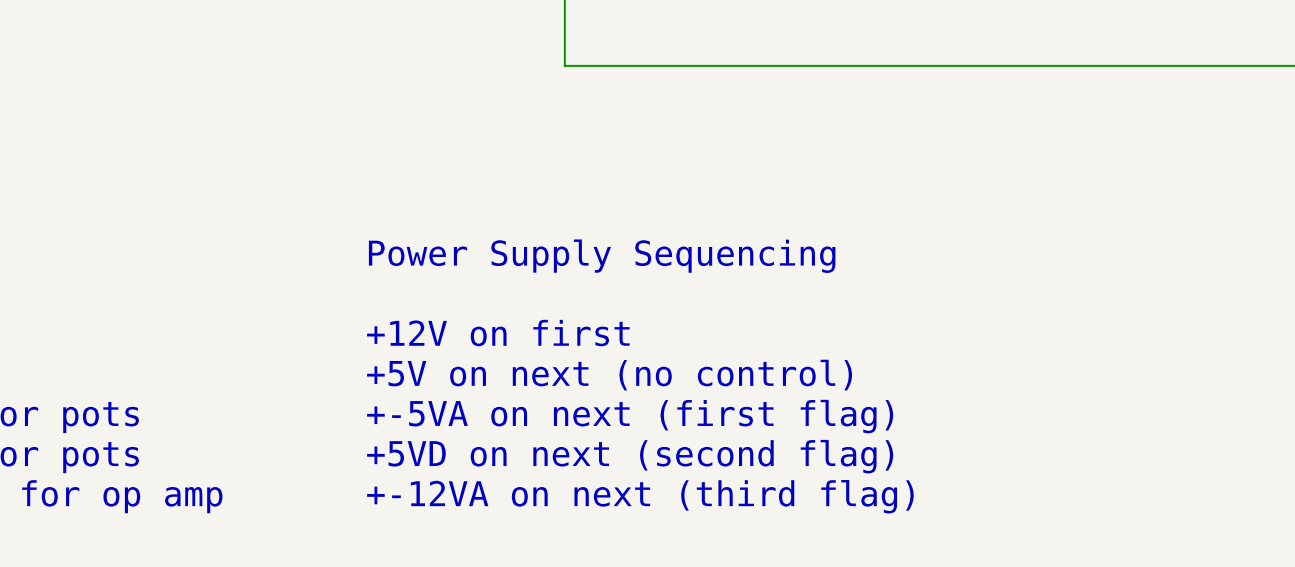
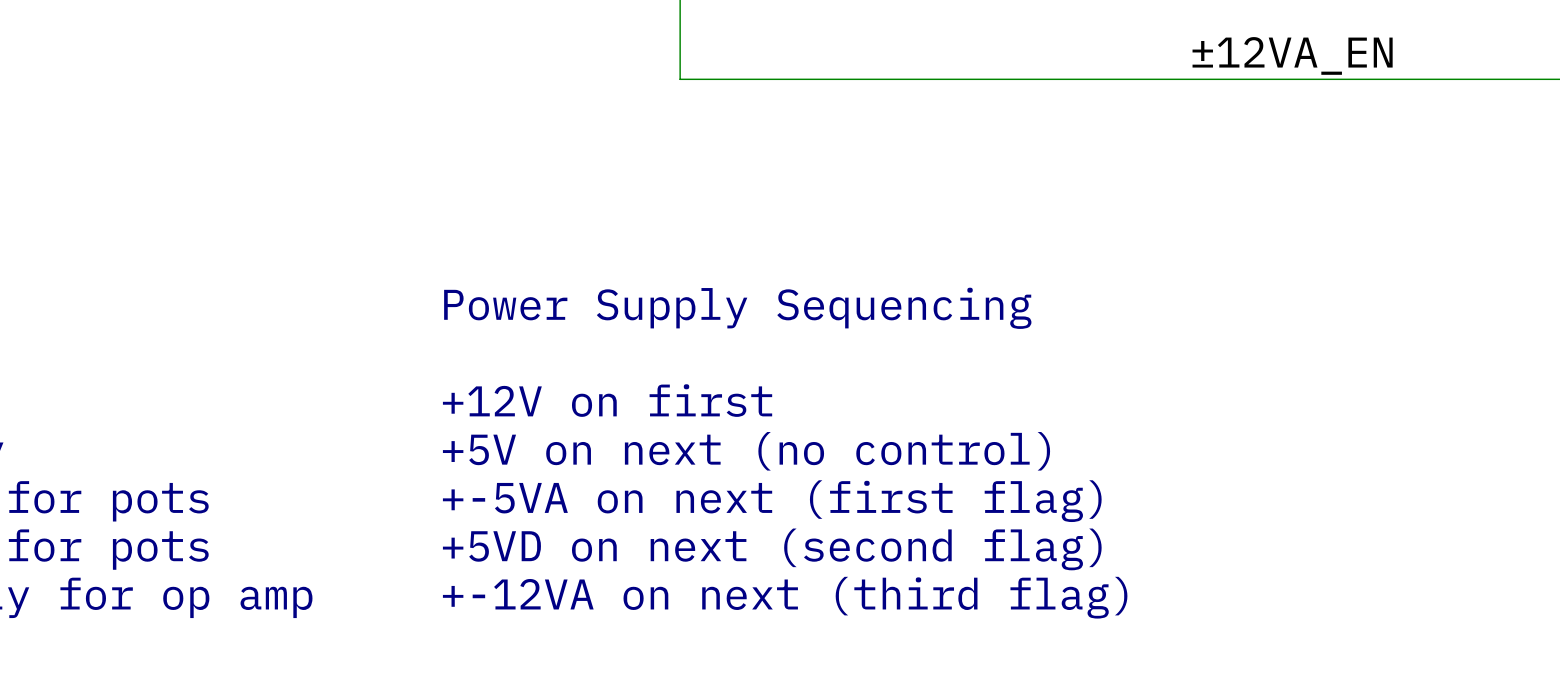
label: none -> ±12VA_EN (1292, 55)

